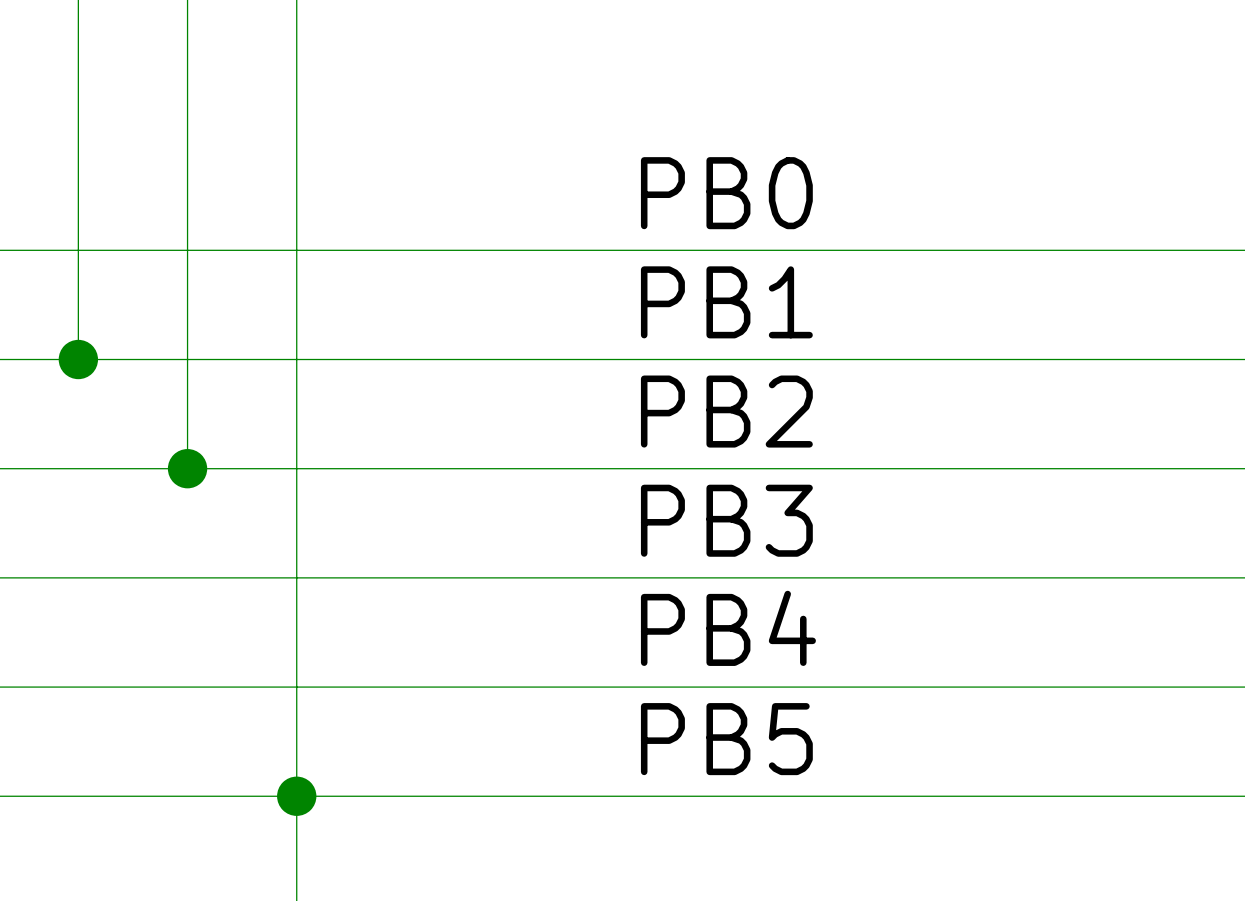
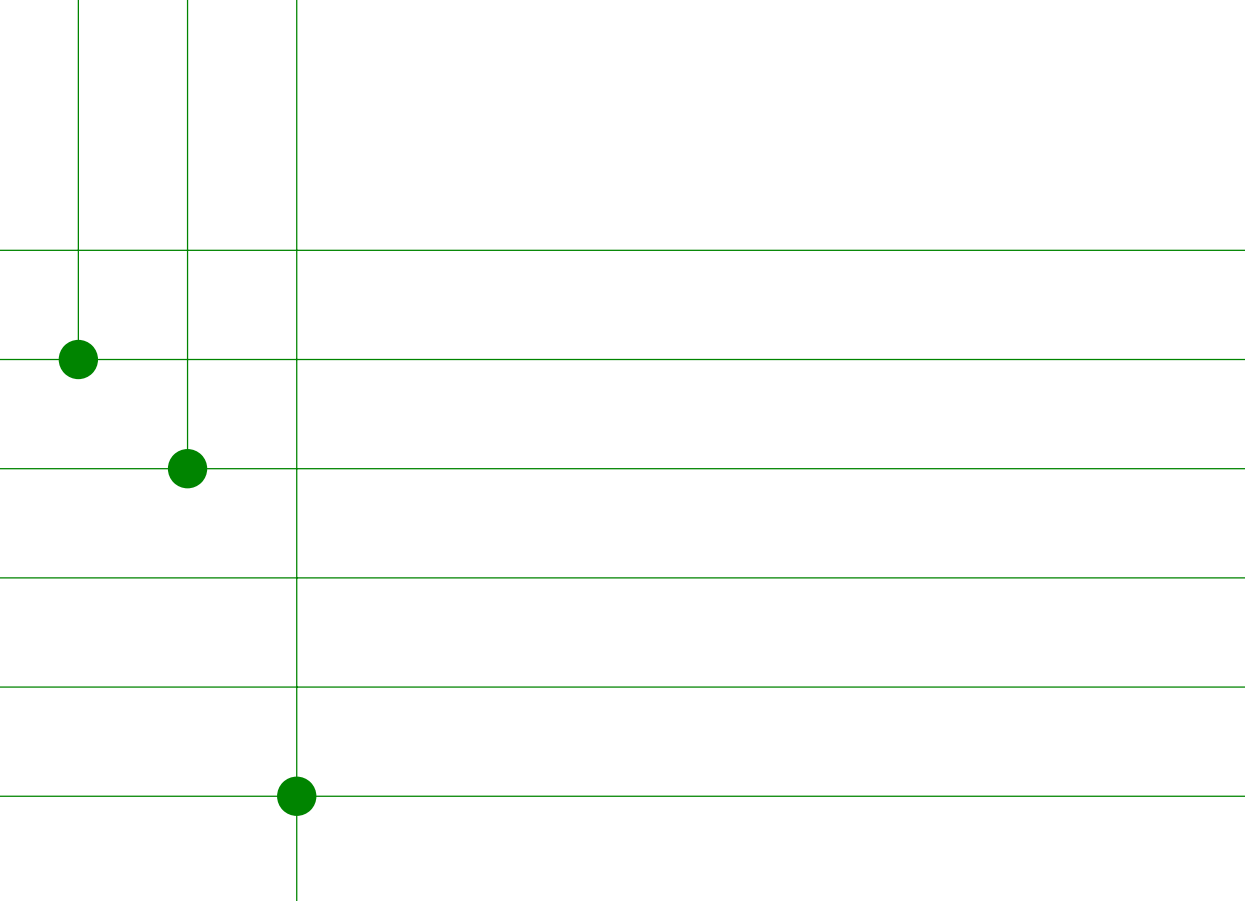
label: PB0 (726, 193) -> none
label: PB1 (726, 302) -> none
label: PB2 (726, 411) -> none
label: PB3 (726, 520) -> none
label: PB4 (728, 628) -> none
label: PB5 (726, 739) -> none

